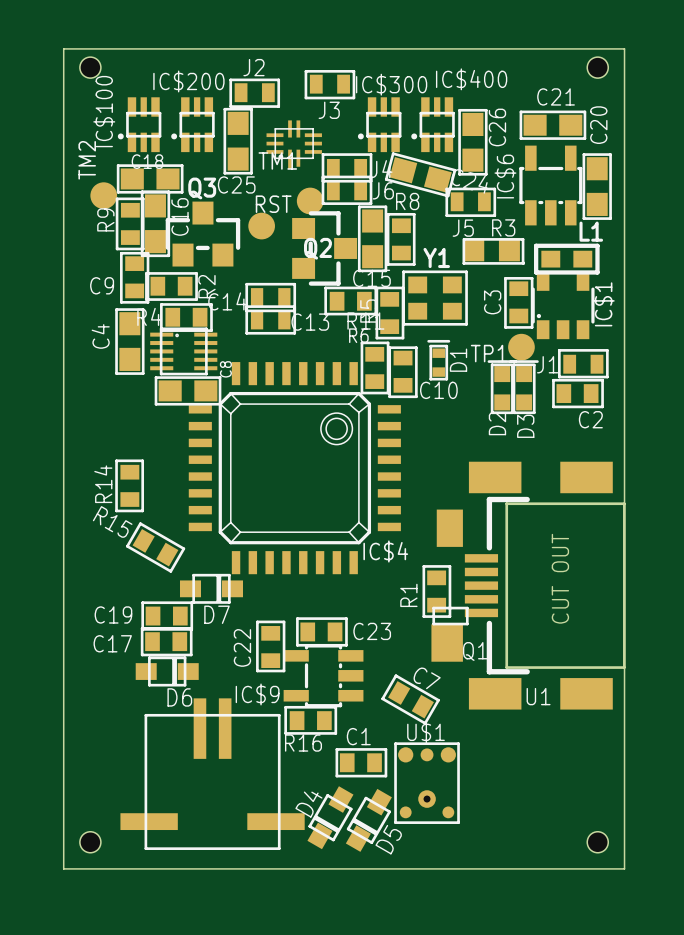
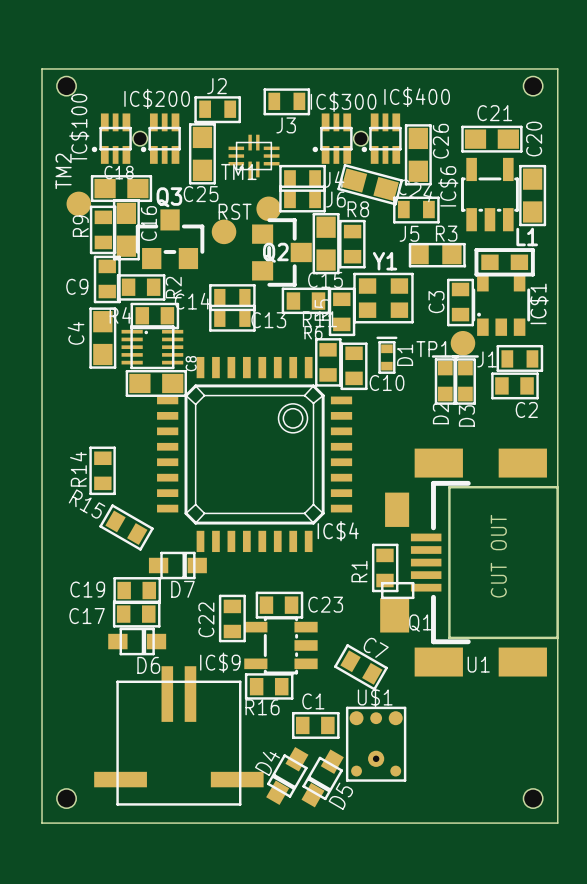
hole: none -> (140, 138)
hole: none -> (360, 138)

